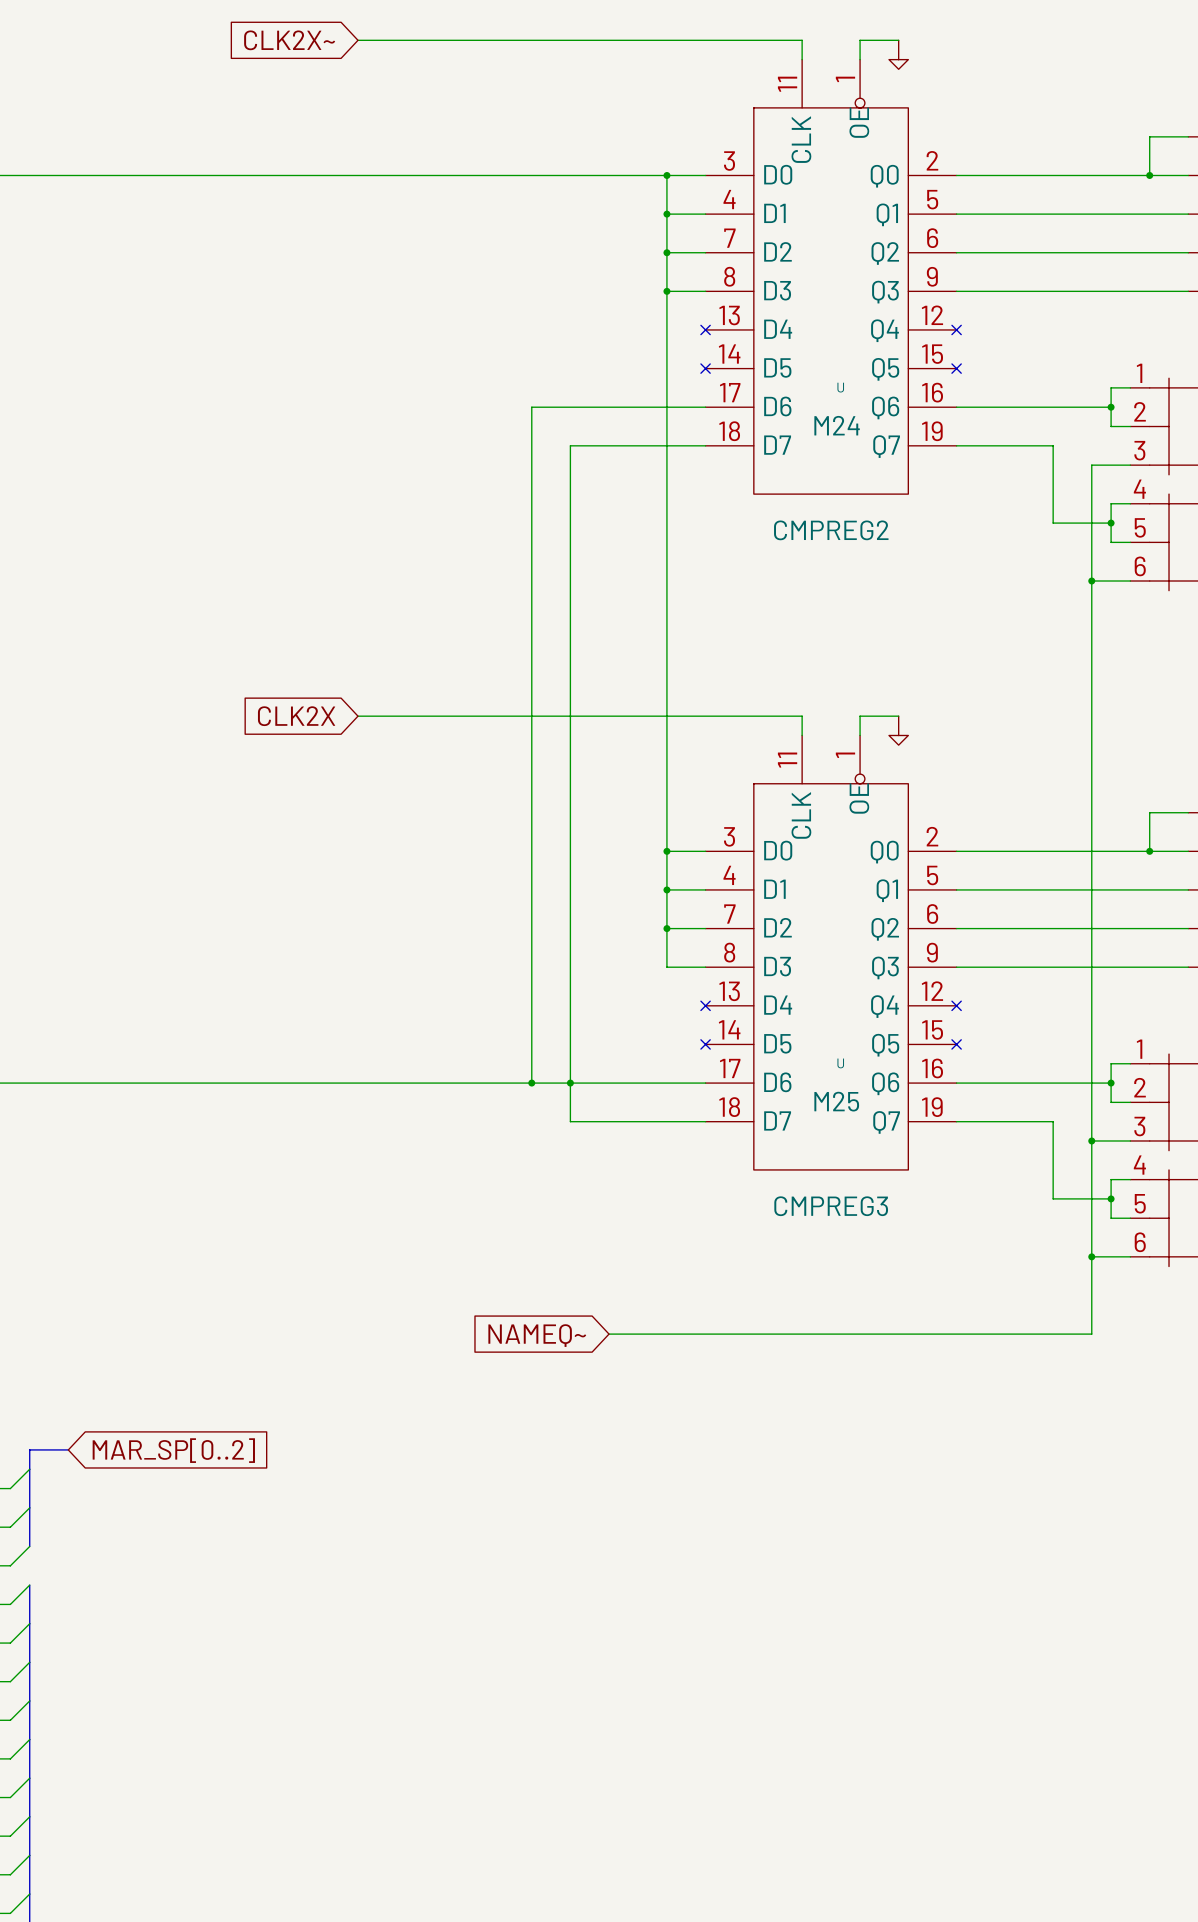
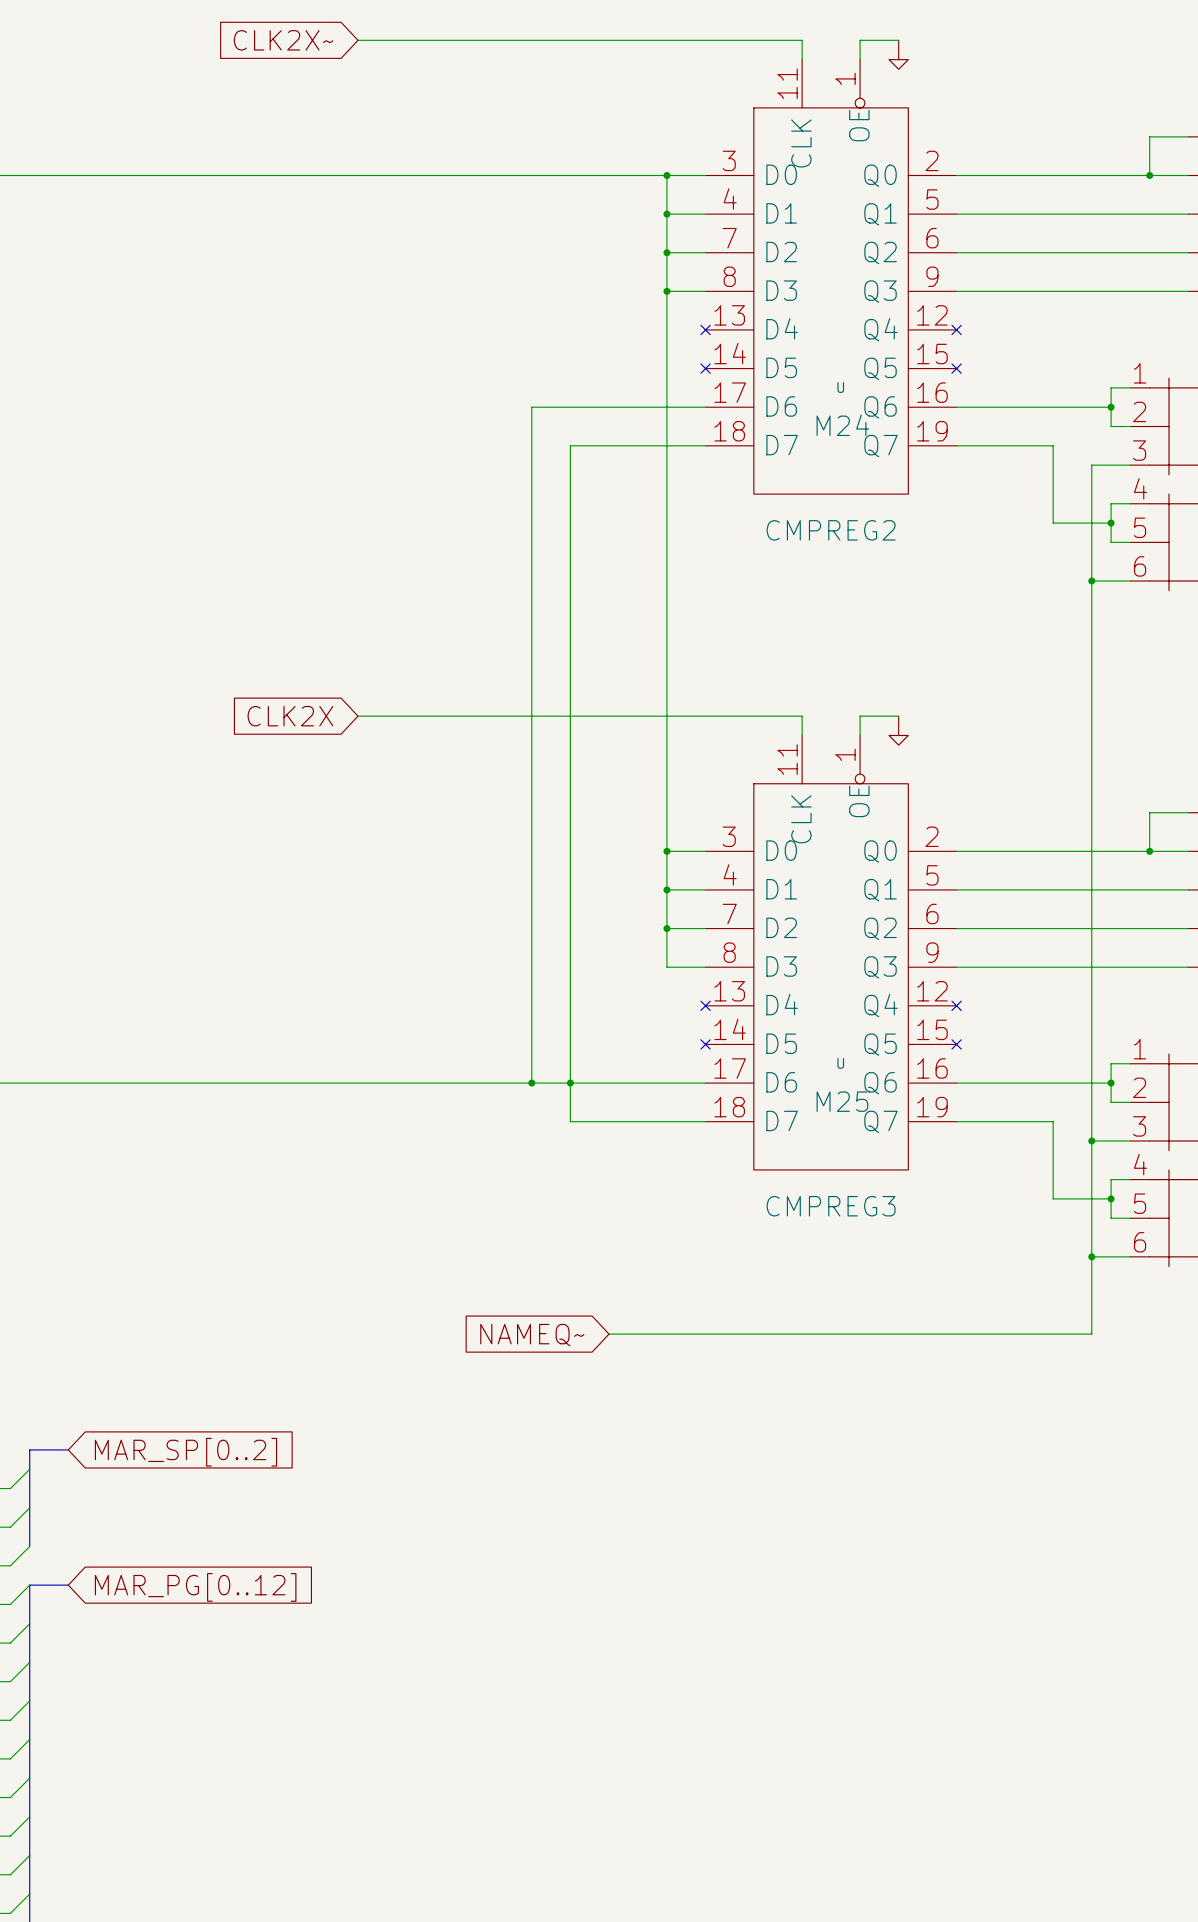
bus: none -> (29, 1585) (68, 1585)
global label: none -> MAR_PG[0..12] (195, 1587)

